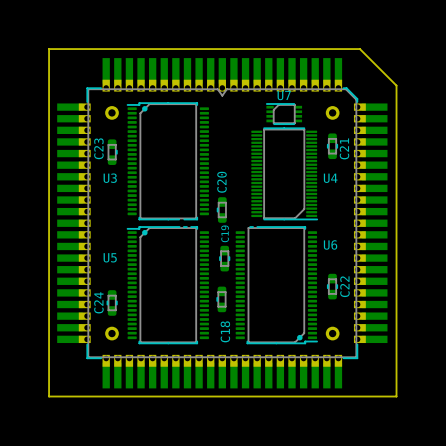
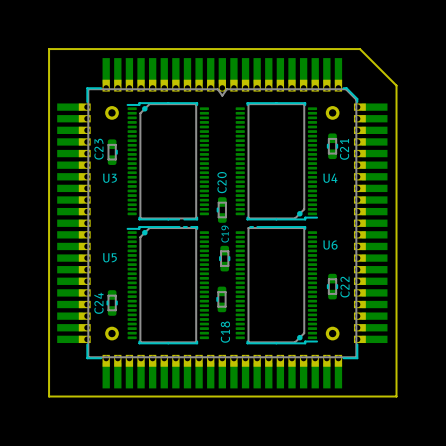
U7: (284, 114) -> none
U4 footprint: [251, 127, 318, 220] -> [235, 102, 318, 220]

